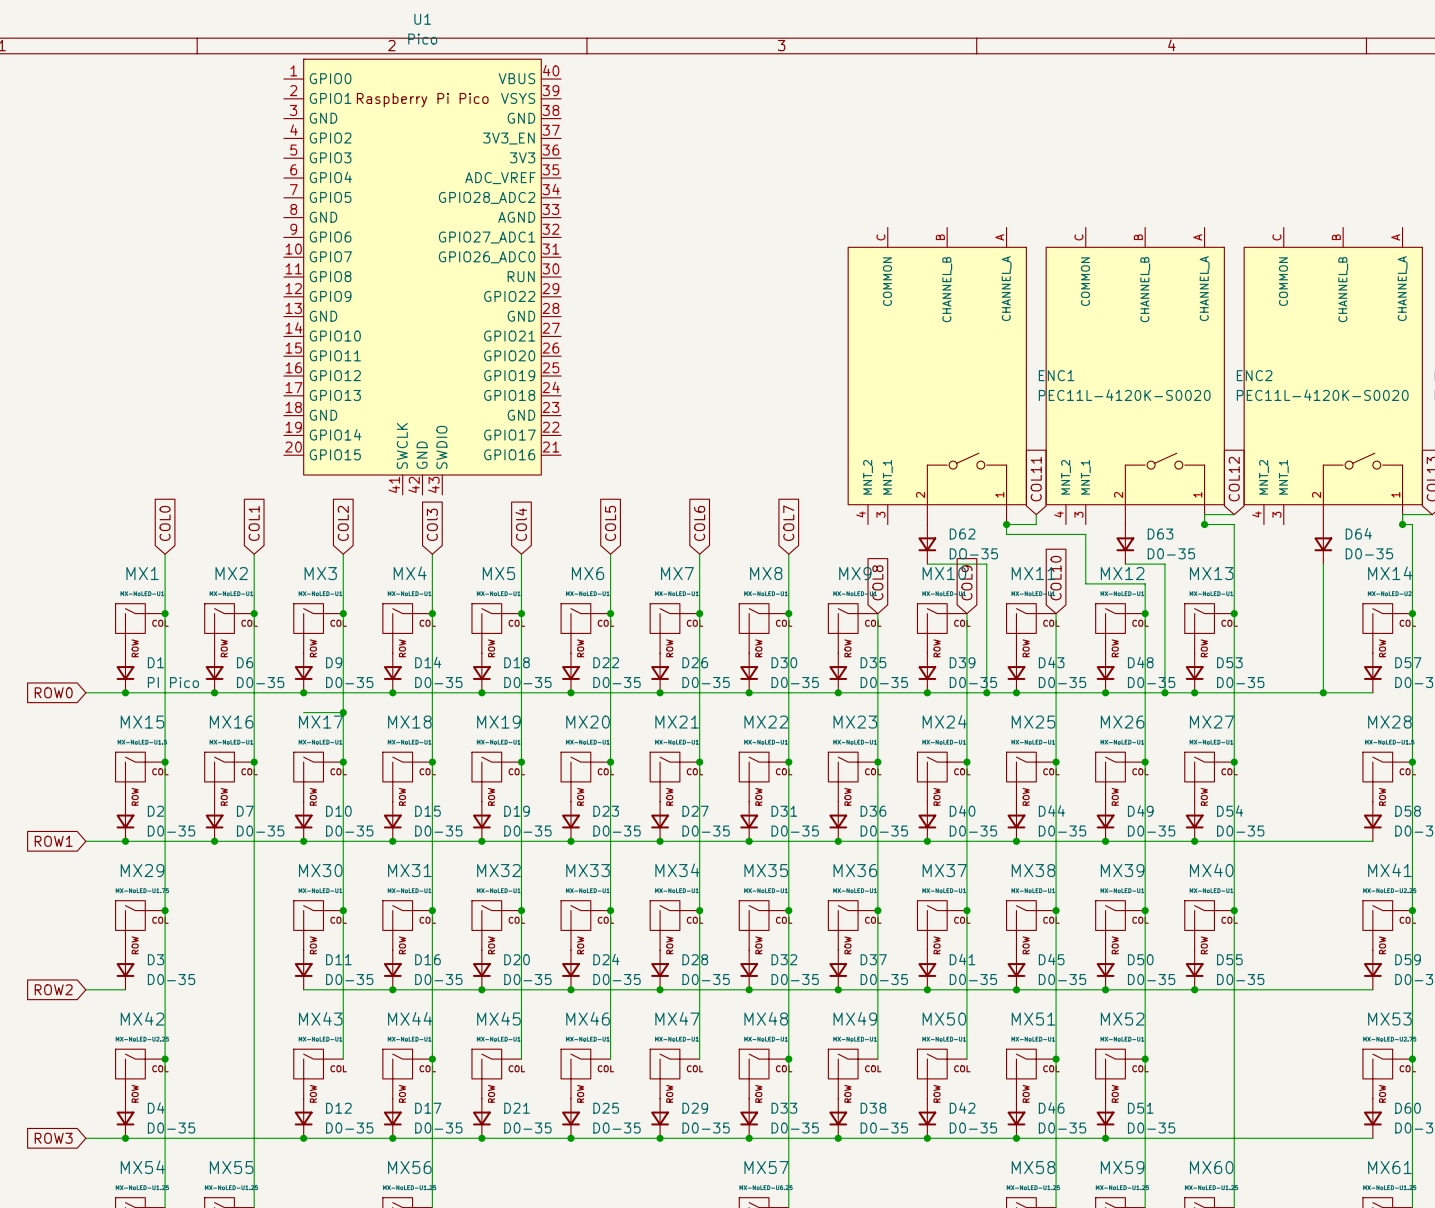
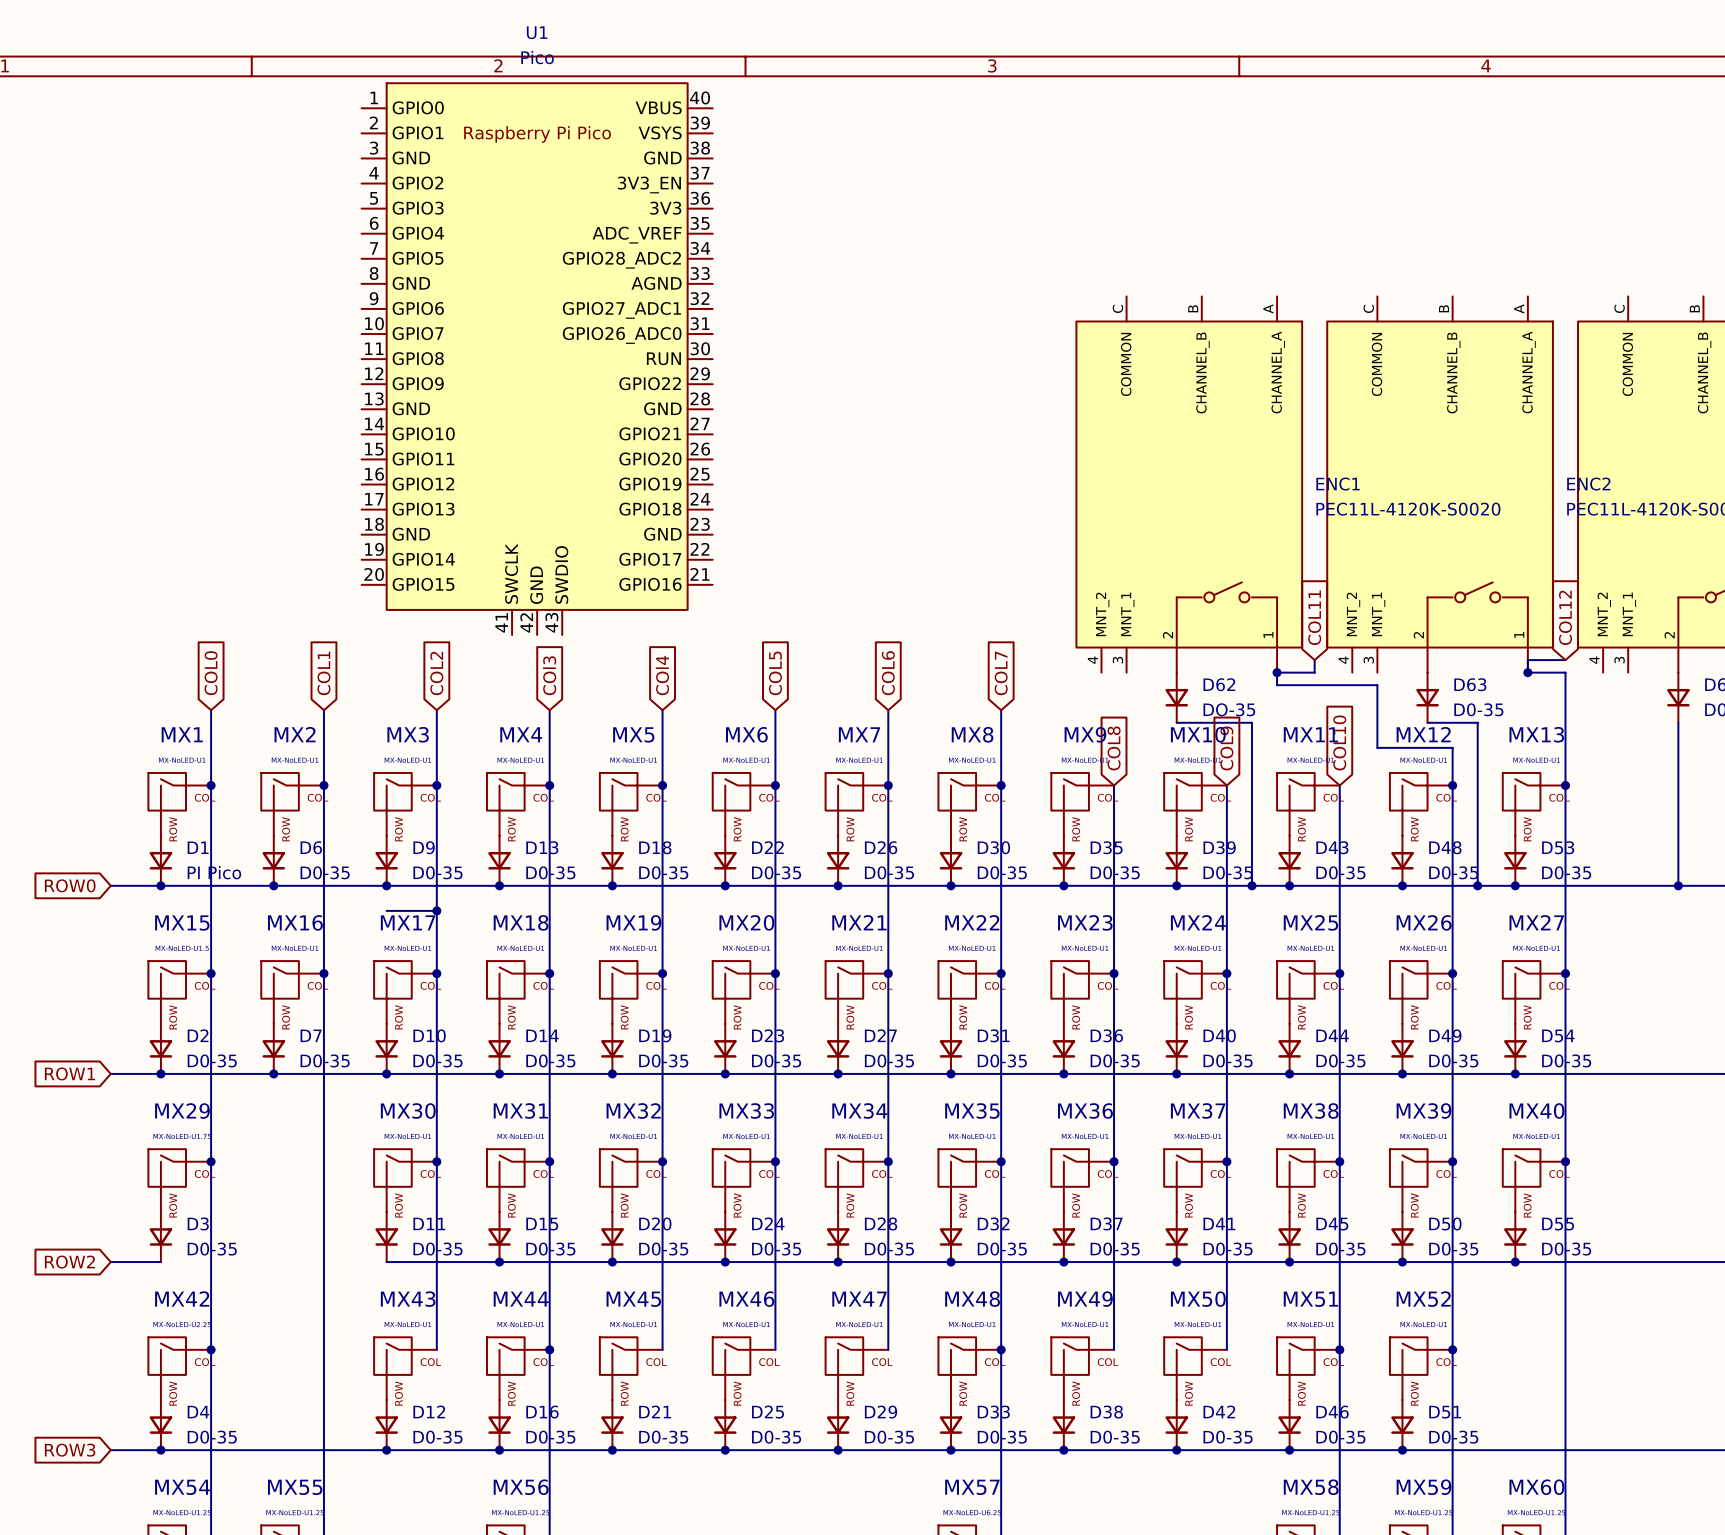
D14 name: D14 (428, 662) -> D13 (542, 847)
D15 name: D15 (427, 811) -> D14 (542, 1035)
D16 name: D16 (427, 959) -> D15 (542, 1224)
D17 name: D17 (428, 1108) -> D16 (542, 1412)

